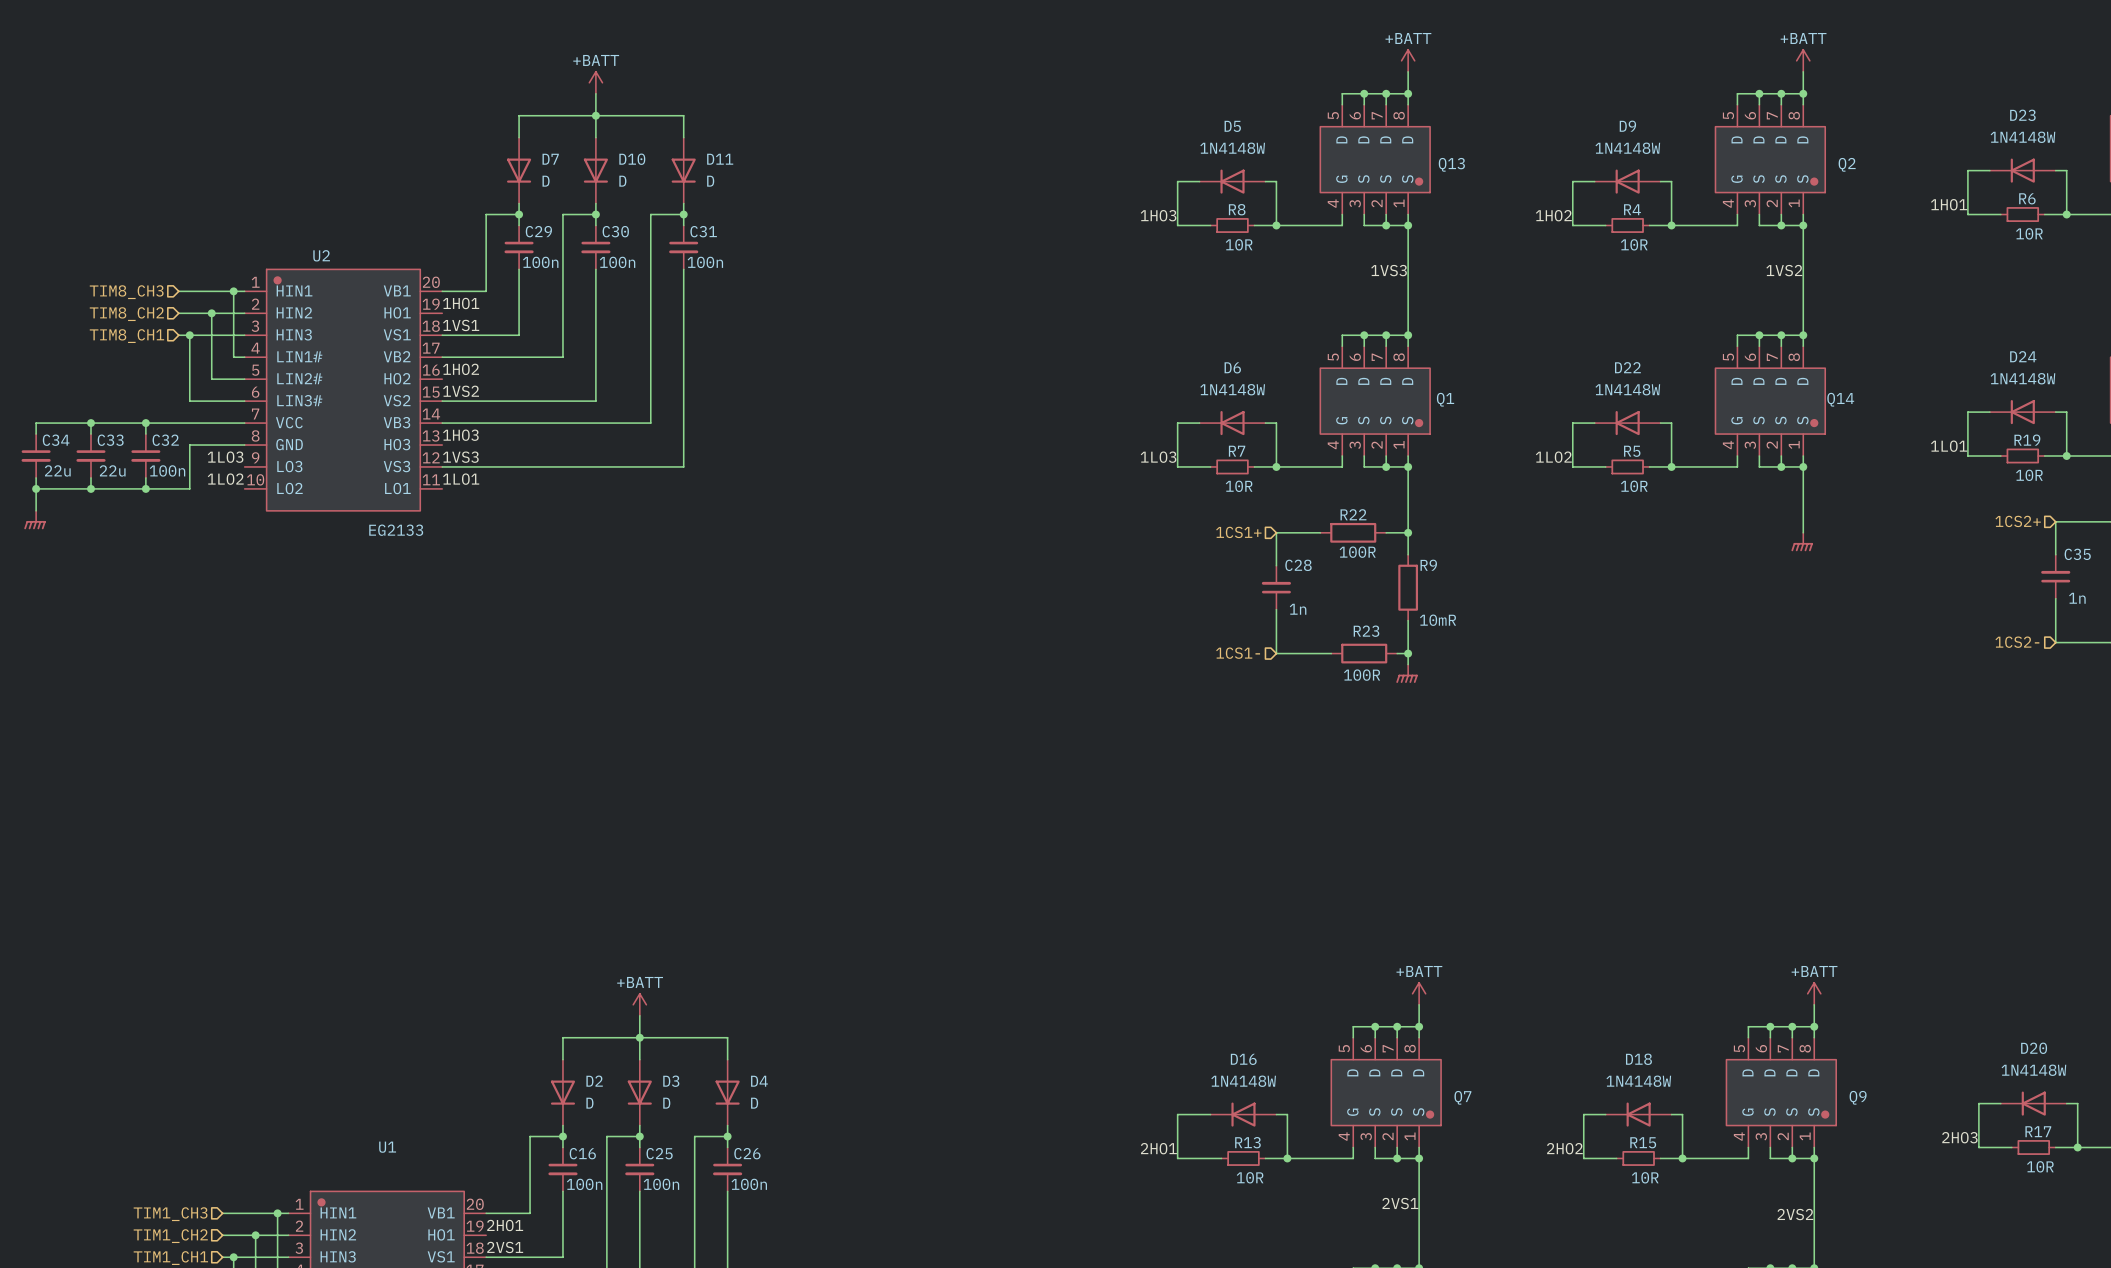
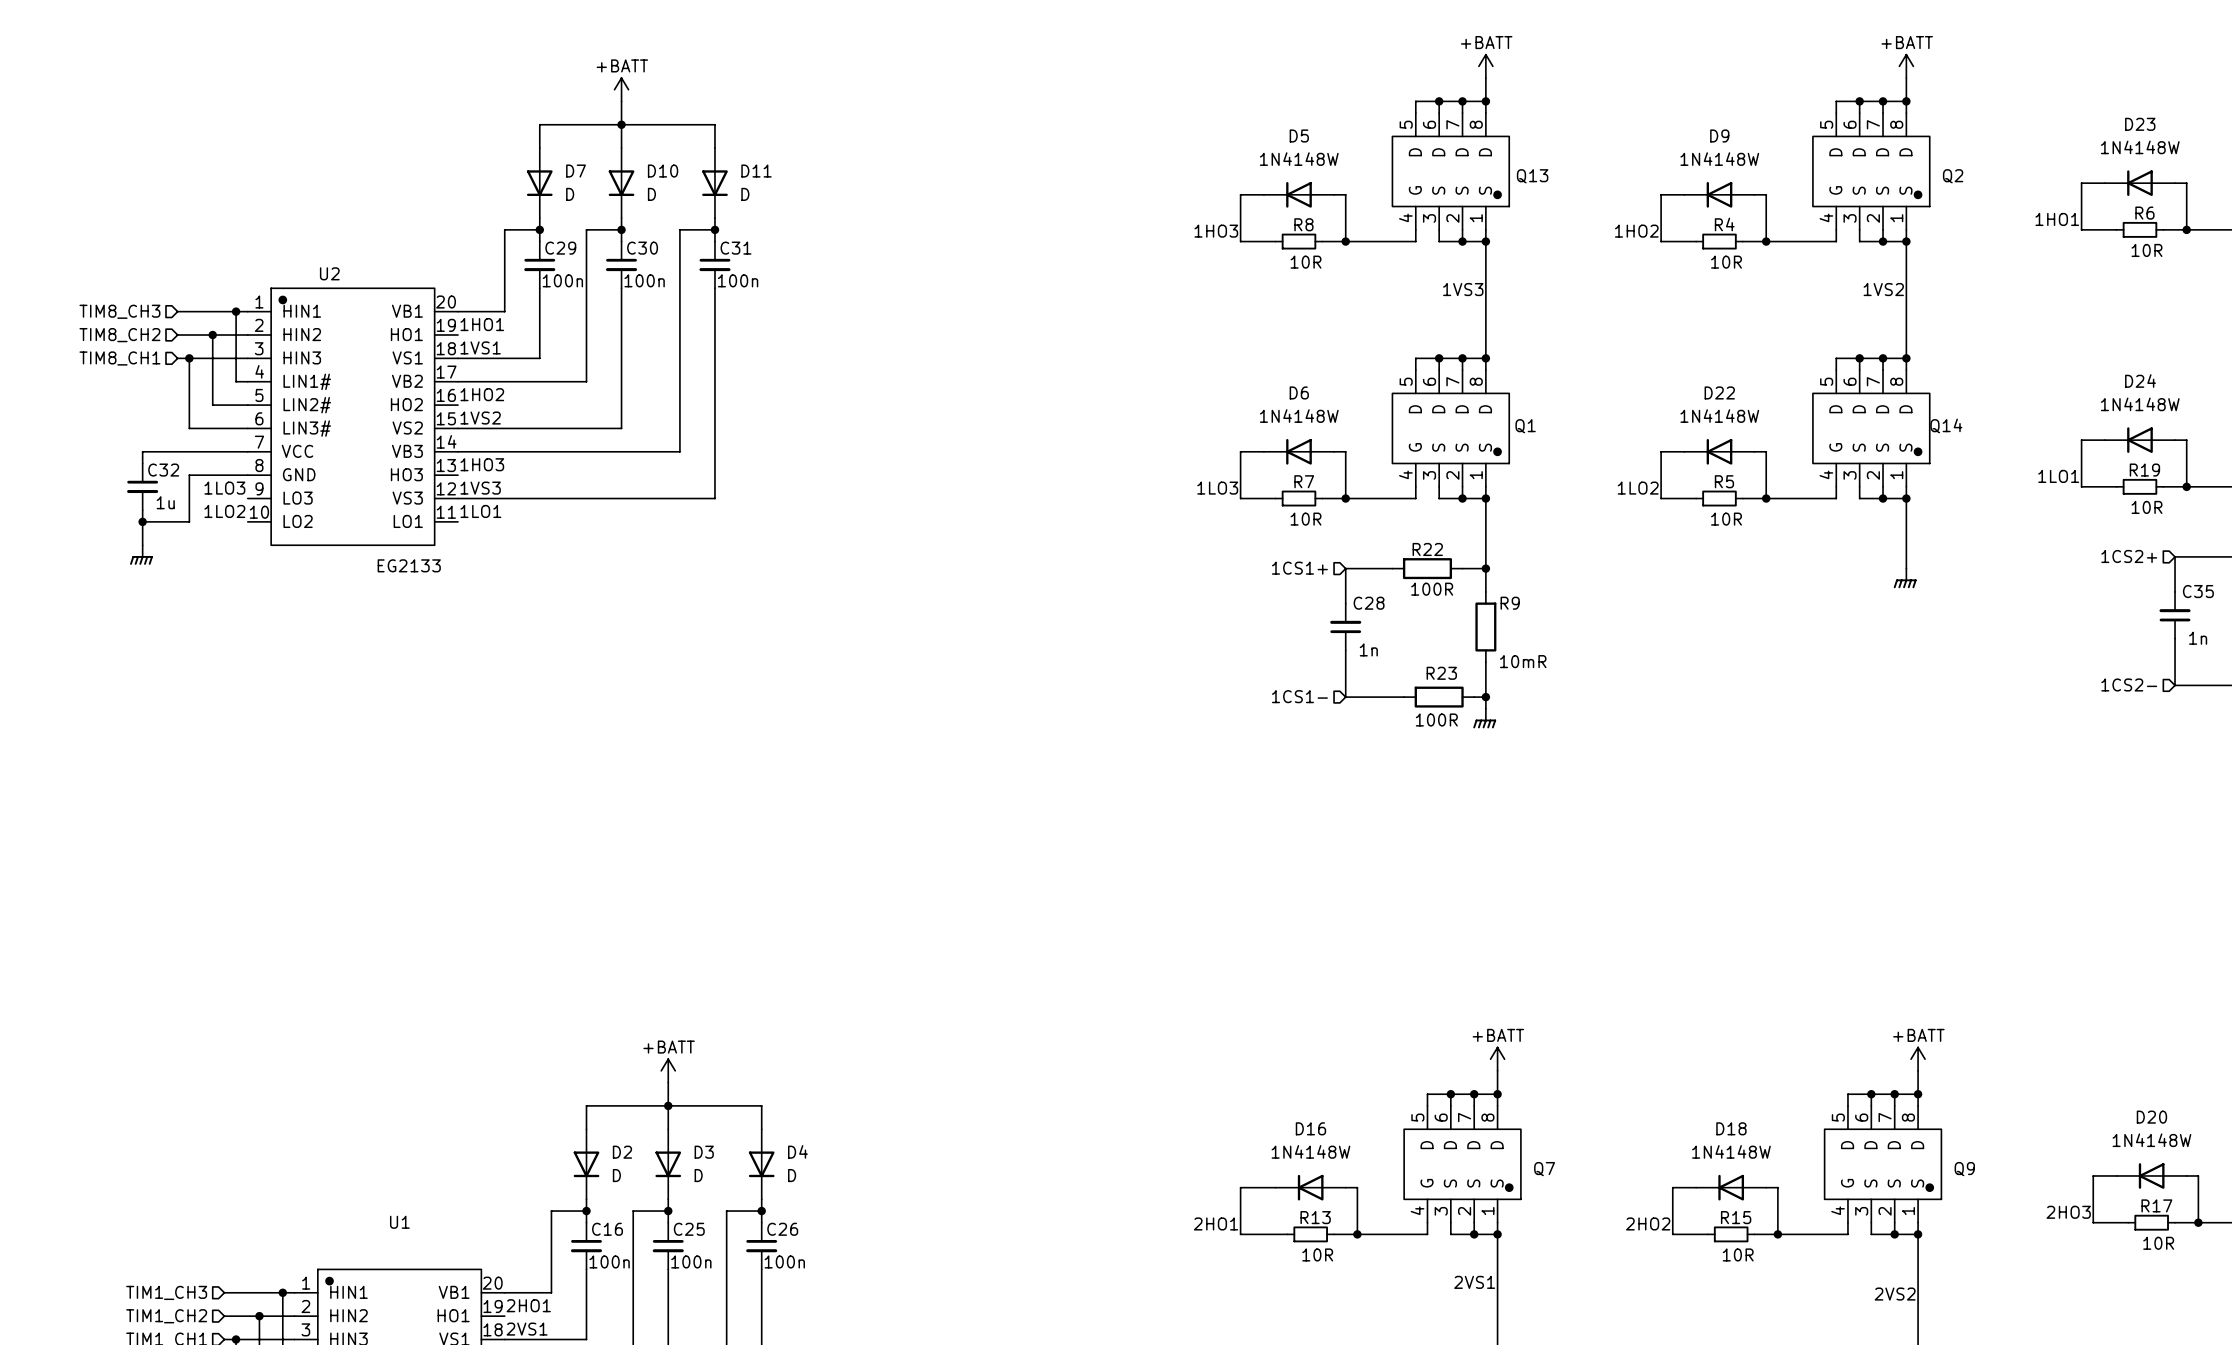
wire: (91, 423) (91, 434) -> none
junction: (91, 423) -> none
wire: (145, 423) (36, 423) (36, 434) -> none
junction: (145, 423) -> none
C34: 22u (36, 455) -> none
C33: 22u (91, 455) -> none
C32 value: 100n (167, 470) -> 1u (165, 502)
wire: (36, 477) (36, 510) -> none
wire: (91, 477) (91, 488) -> none
wire: (36, 488) (145, 488) -> (142, 545) (142, 521)
junction: (36, 488) -> none
junction: (91, 488) -> none
power symbol position: (35, 520) -> (141, 555)

